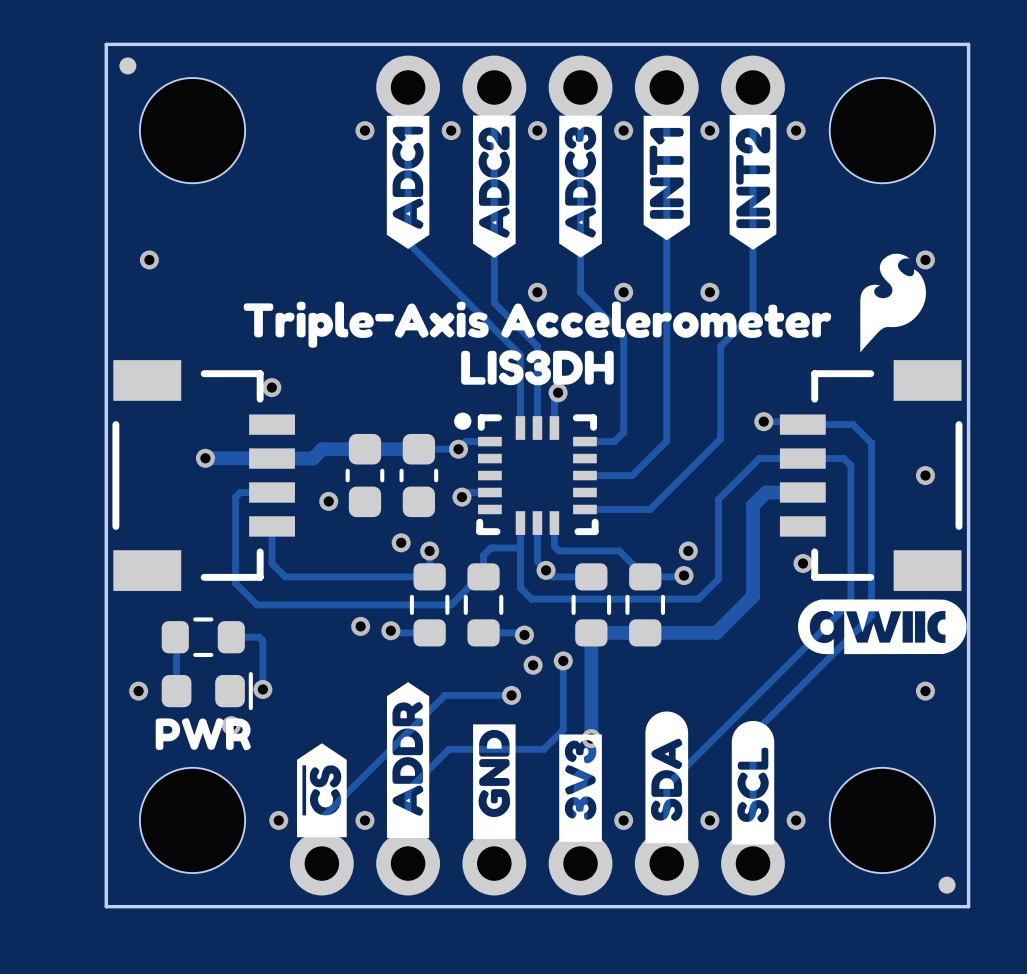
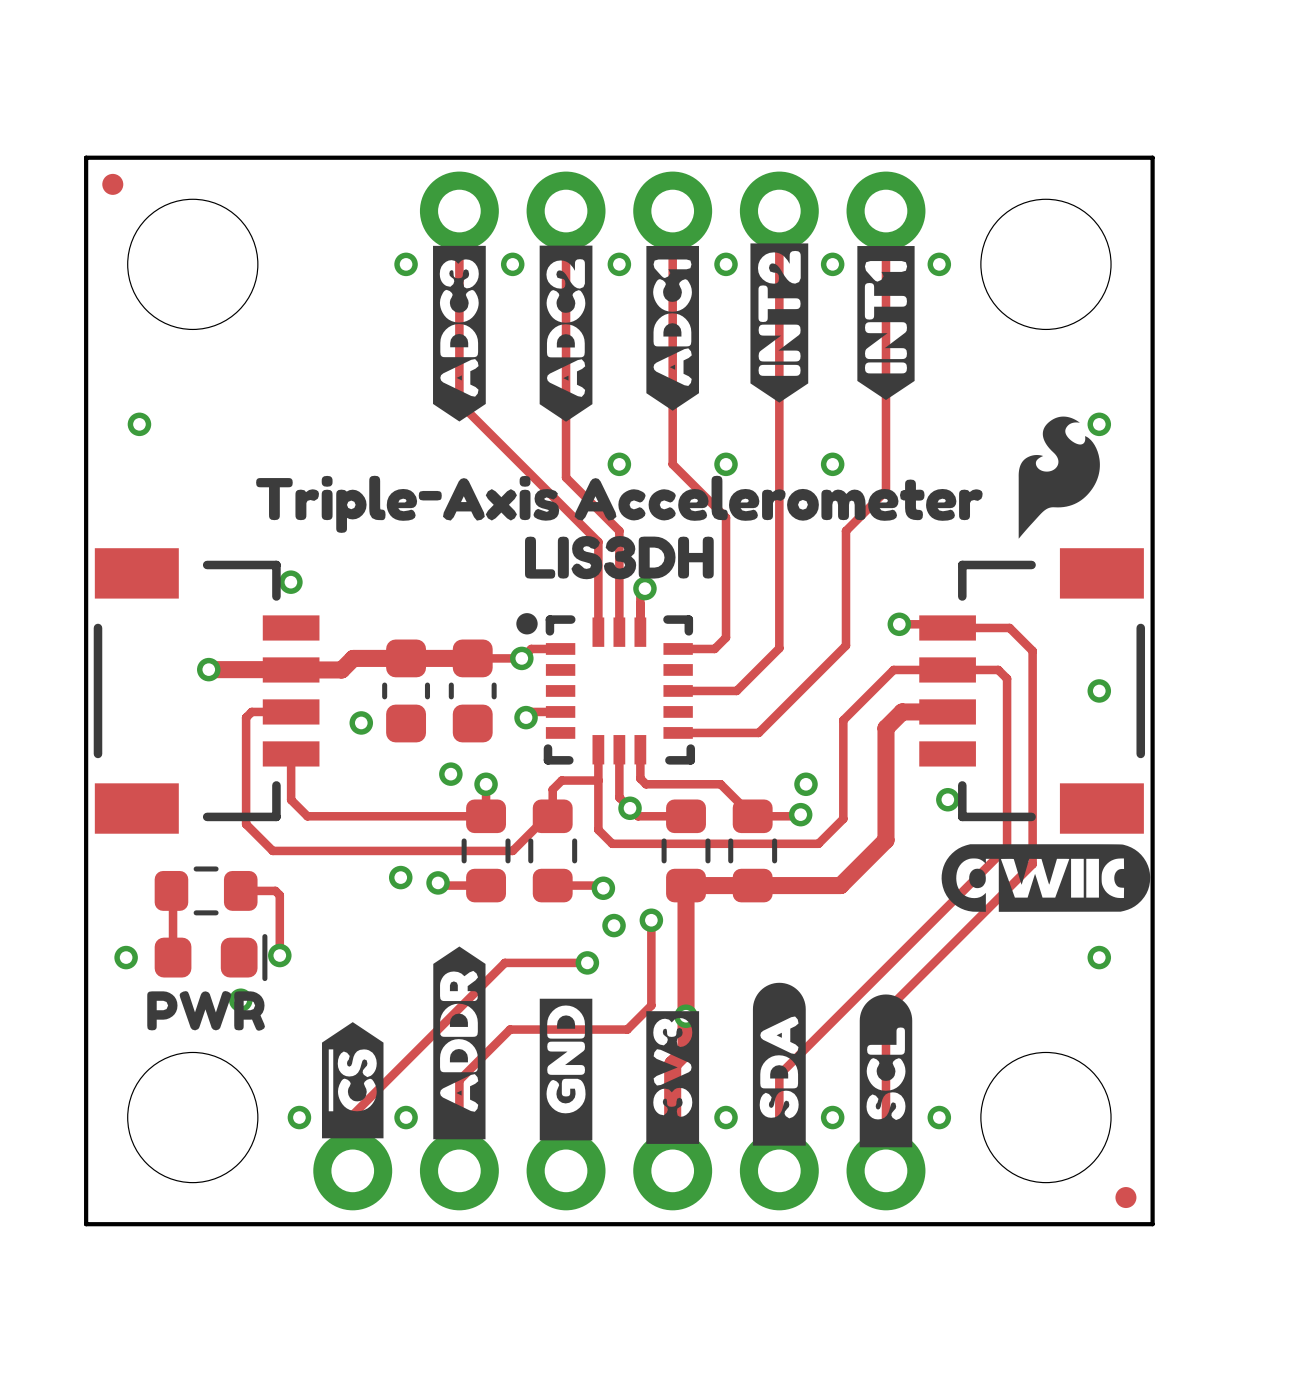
drawing: none -> [750, 243, 809, 403]
drawing: [729, 114, 777, 250] -> none
drawing position: (666, 178) -> (885, 323)
drawing position: (408, 182) -> (672, 328)
drawing position: (580, 186) -> (459, 333)

